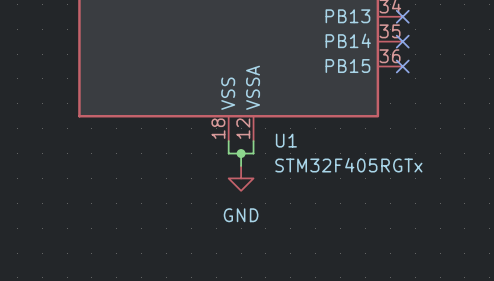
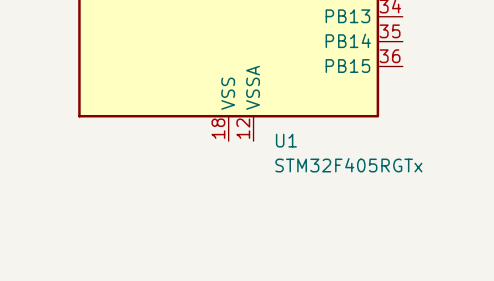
no-connect mark: (402, 16) -> none
no-connect mark: (402, 41) -> none
no-connect mark: (402, 66) -> none
wire: (228, 141) (228, 153) (253, 153) (253, 141) -> none
wire: (241, 153) (241, 165) -> none
junction: (241, 153) -> none
power symbol: GND (241, 178) -> none

